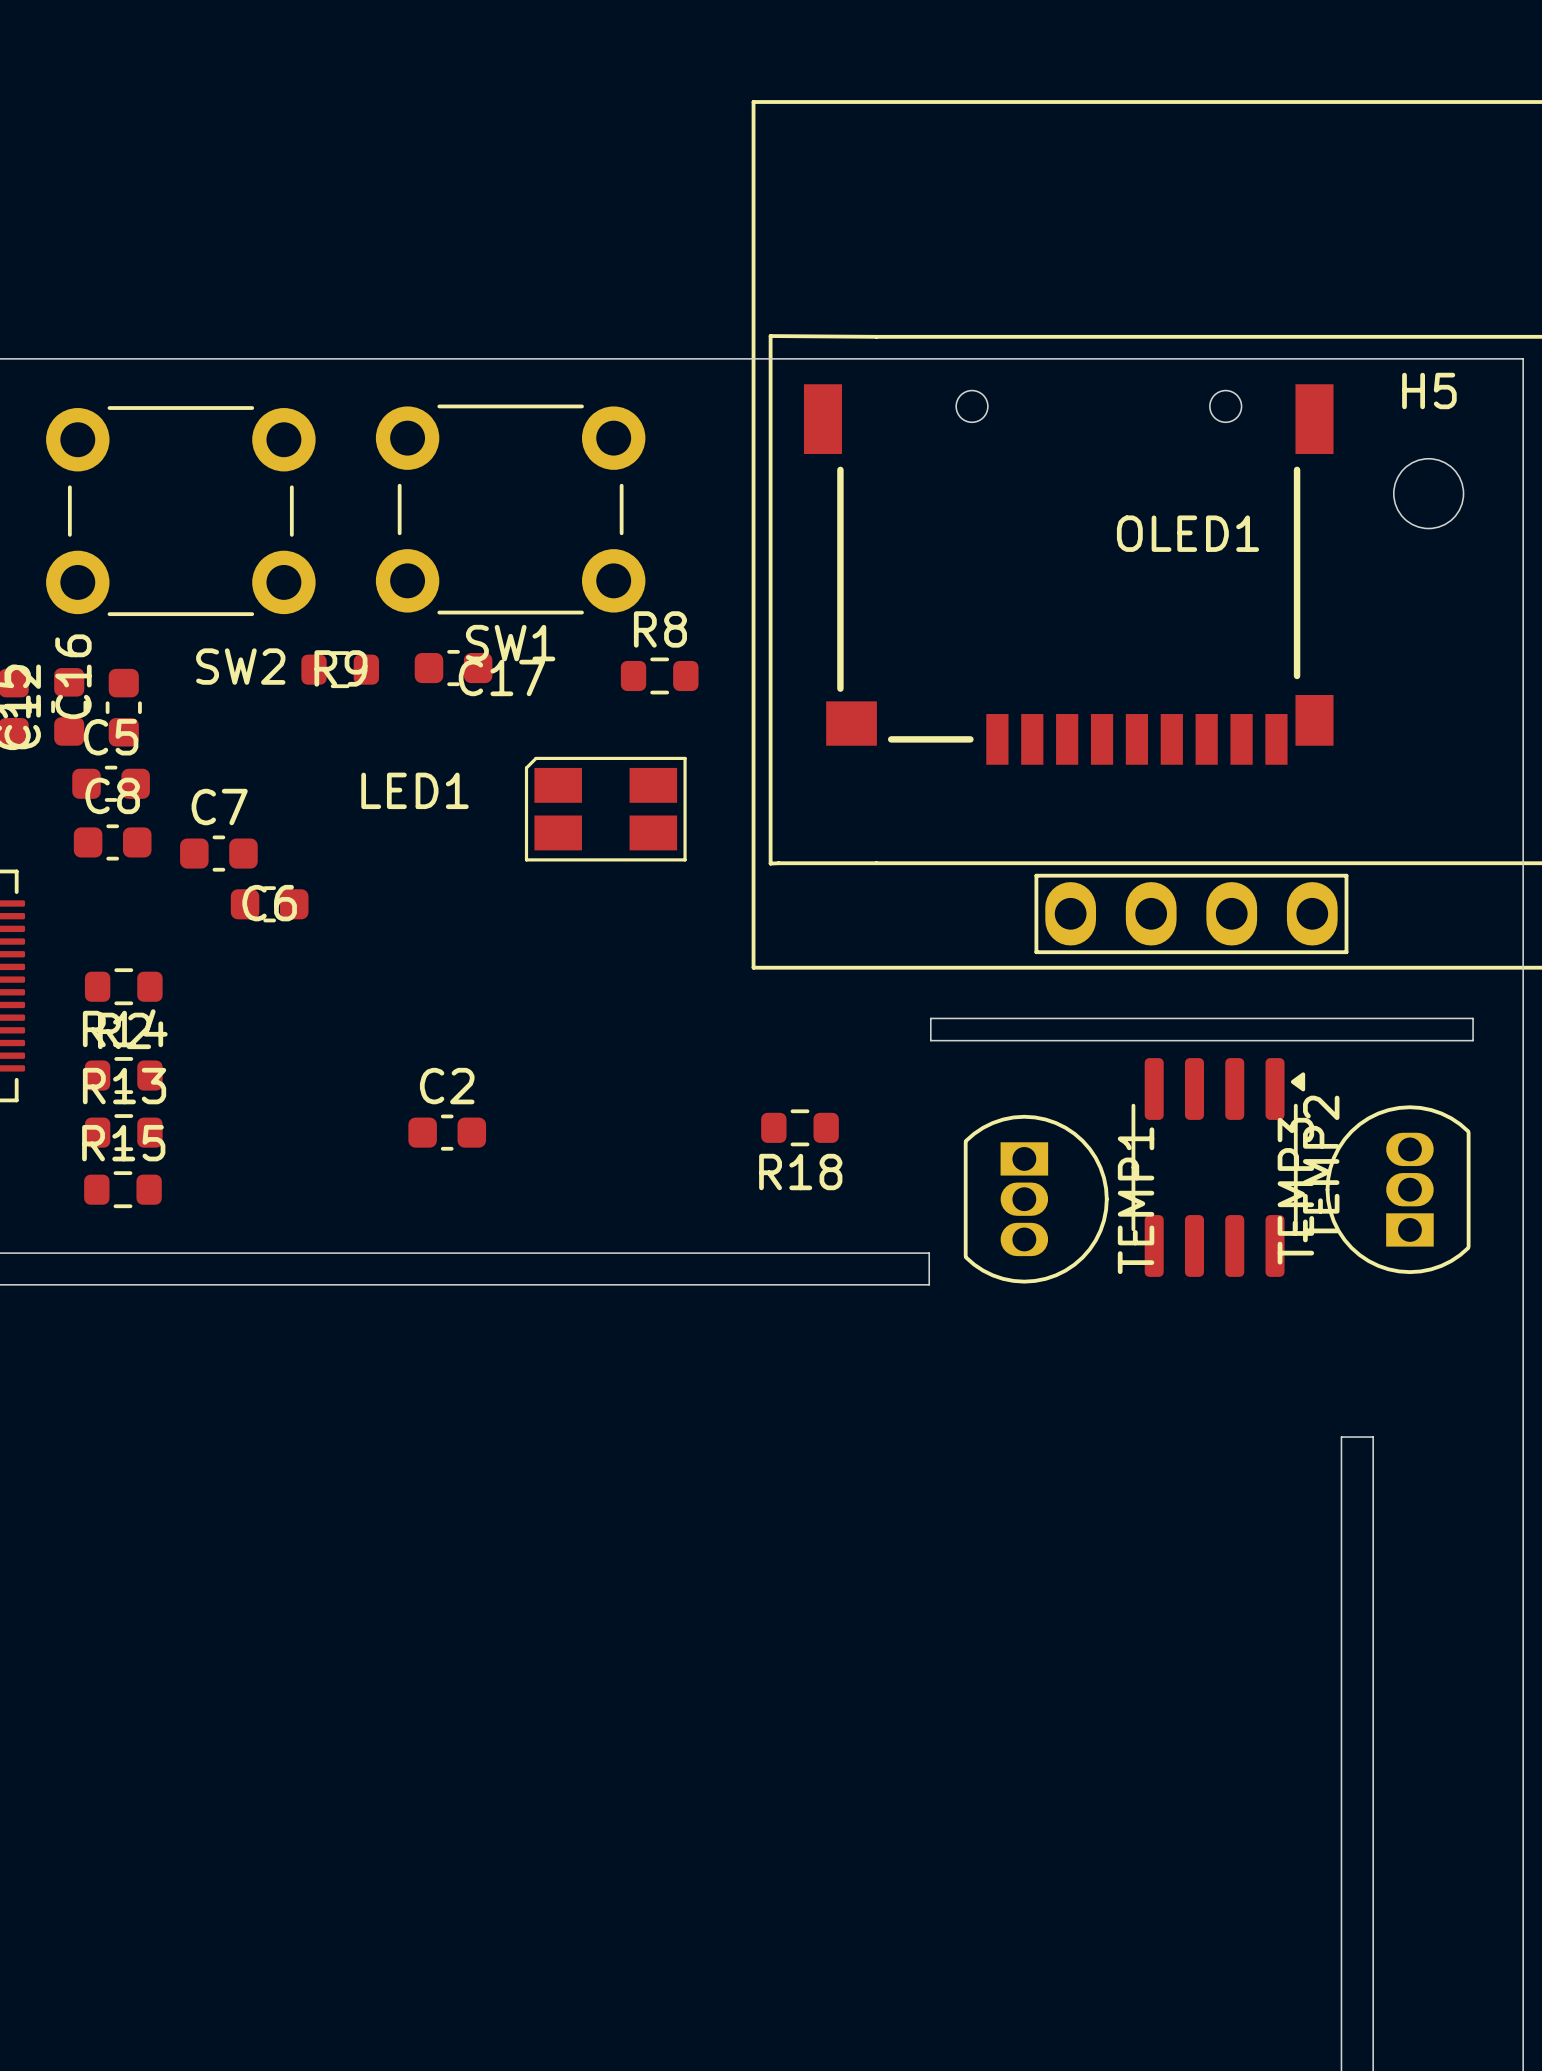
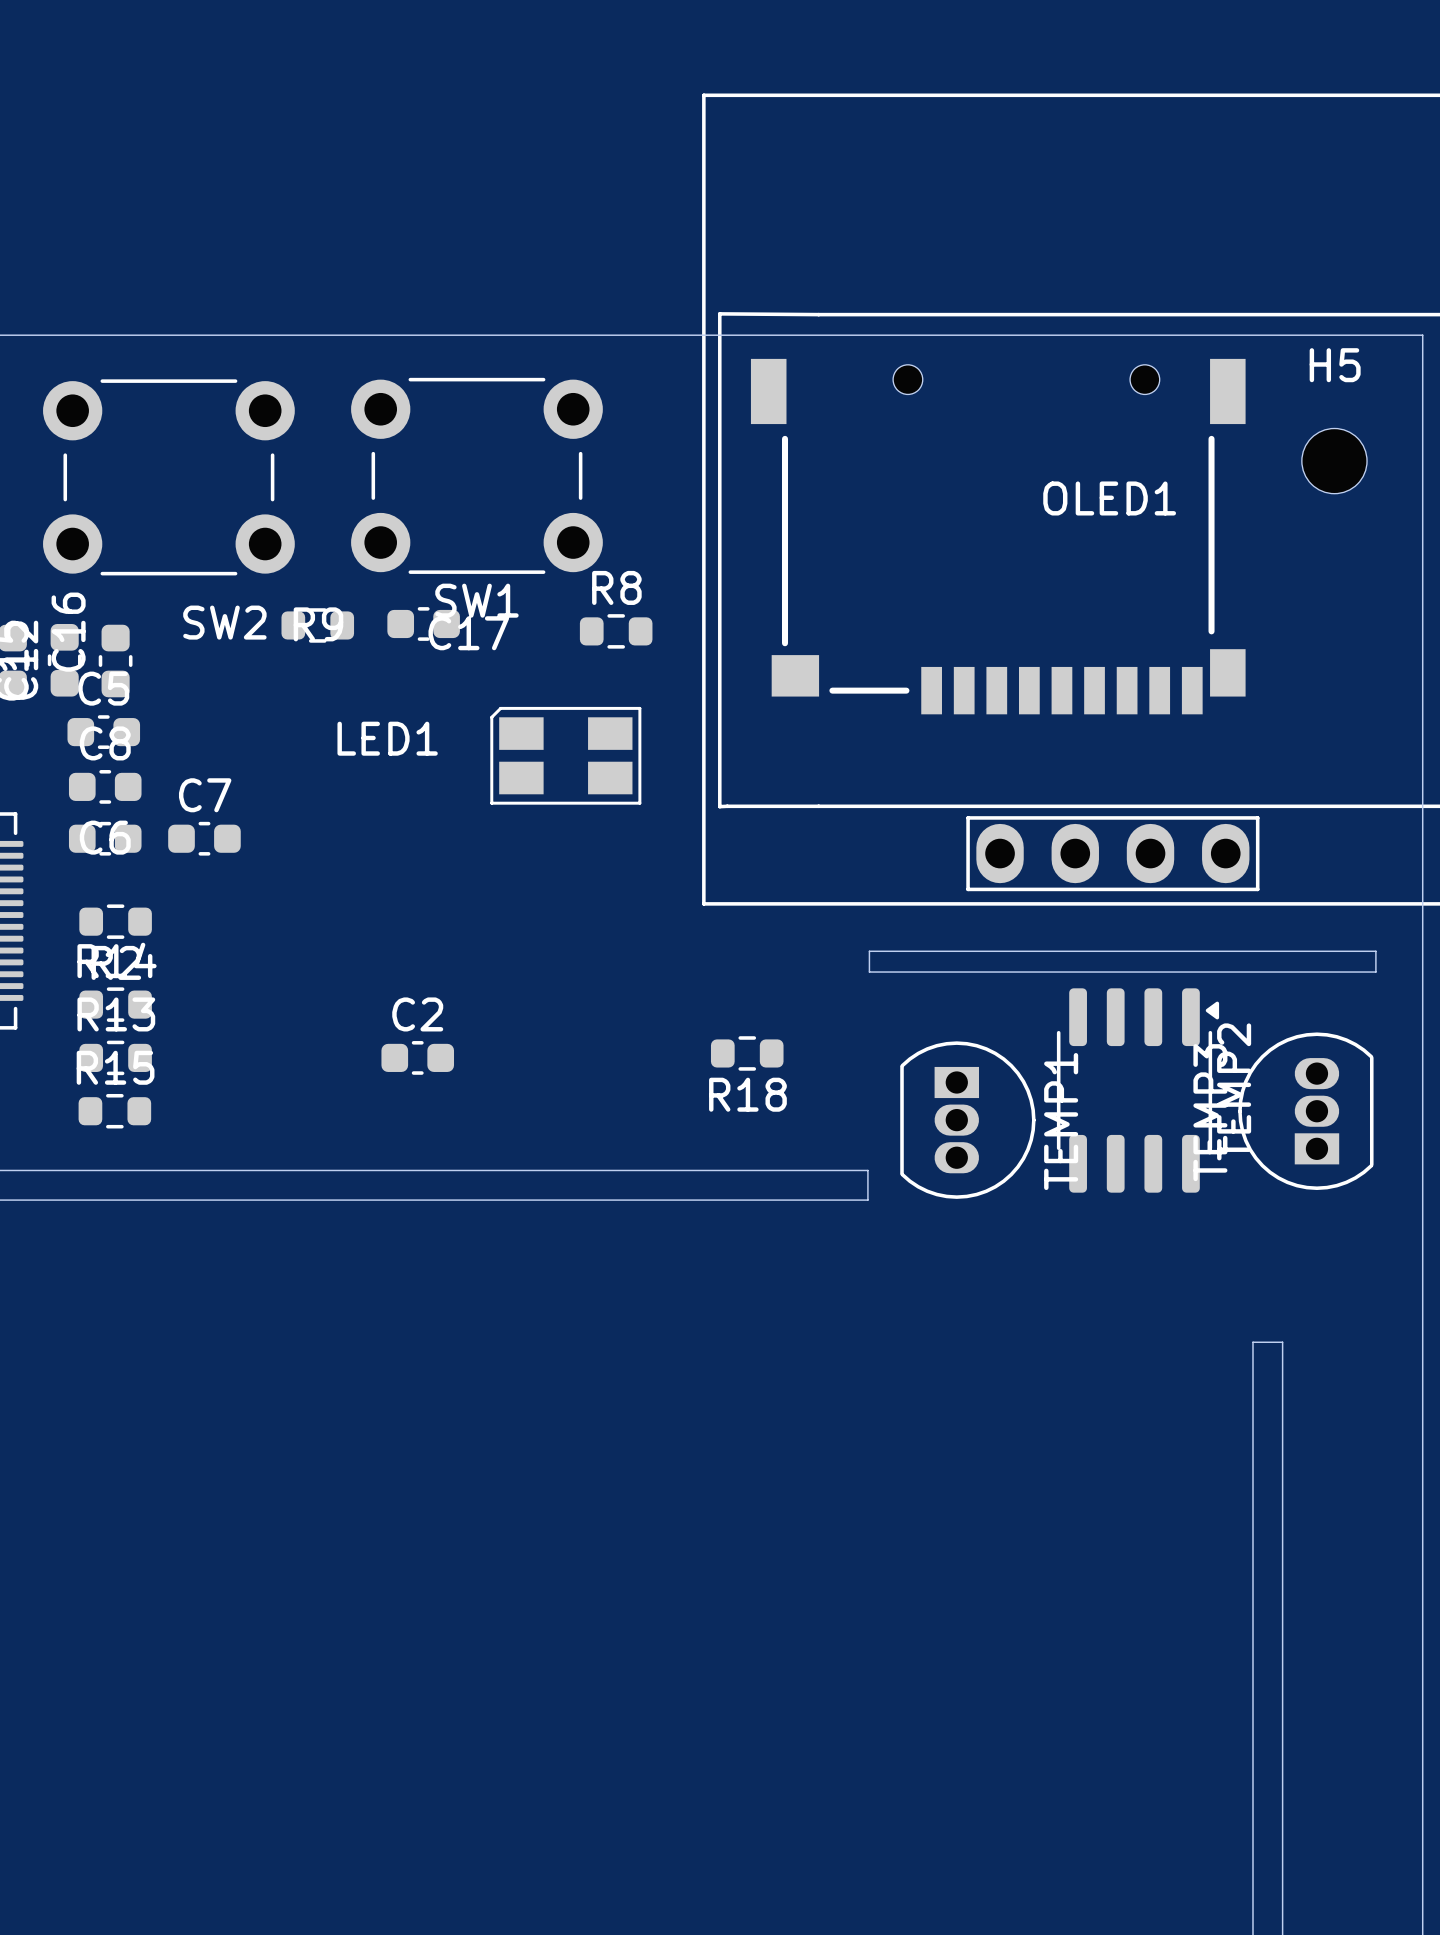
C7 position: (218, 853) -> (204, 838)
C6 position: (269, 904) -> (105, 838)

